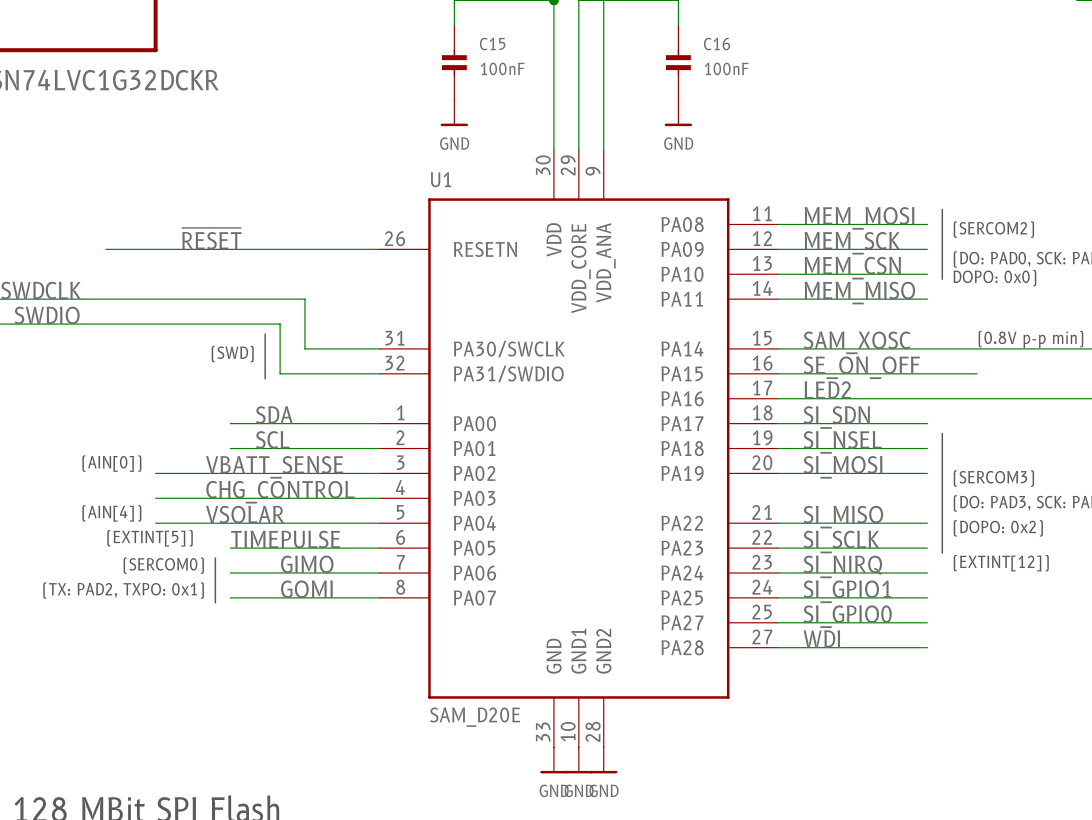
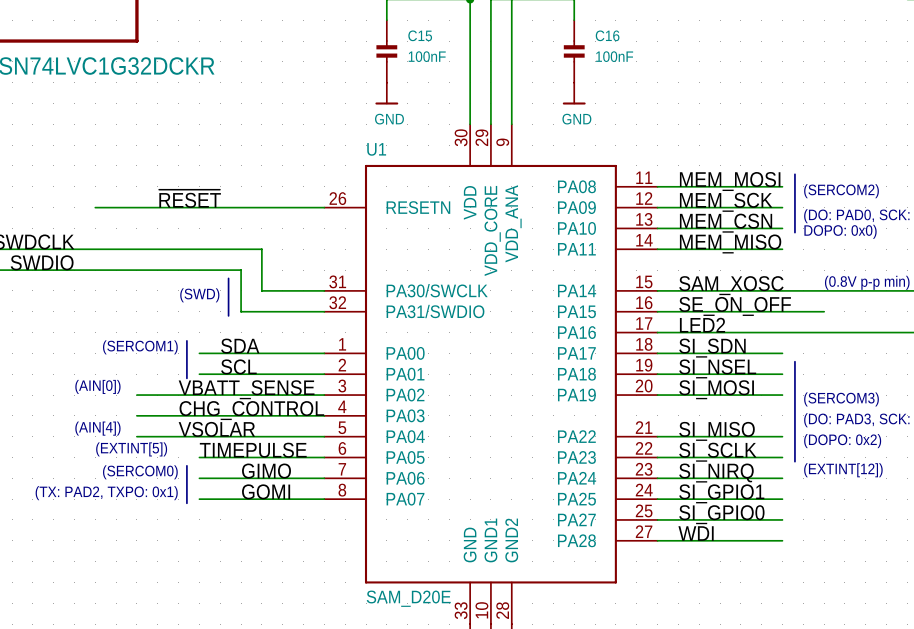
line: none -> (186, 340) (186, 378)
text: none -> (SERCOM1) (140, 347)

